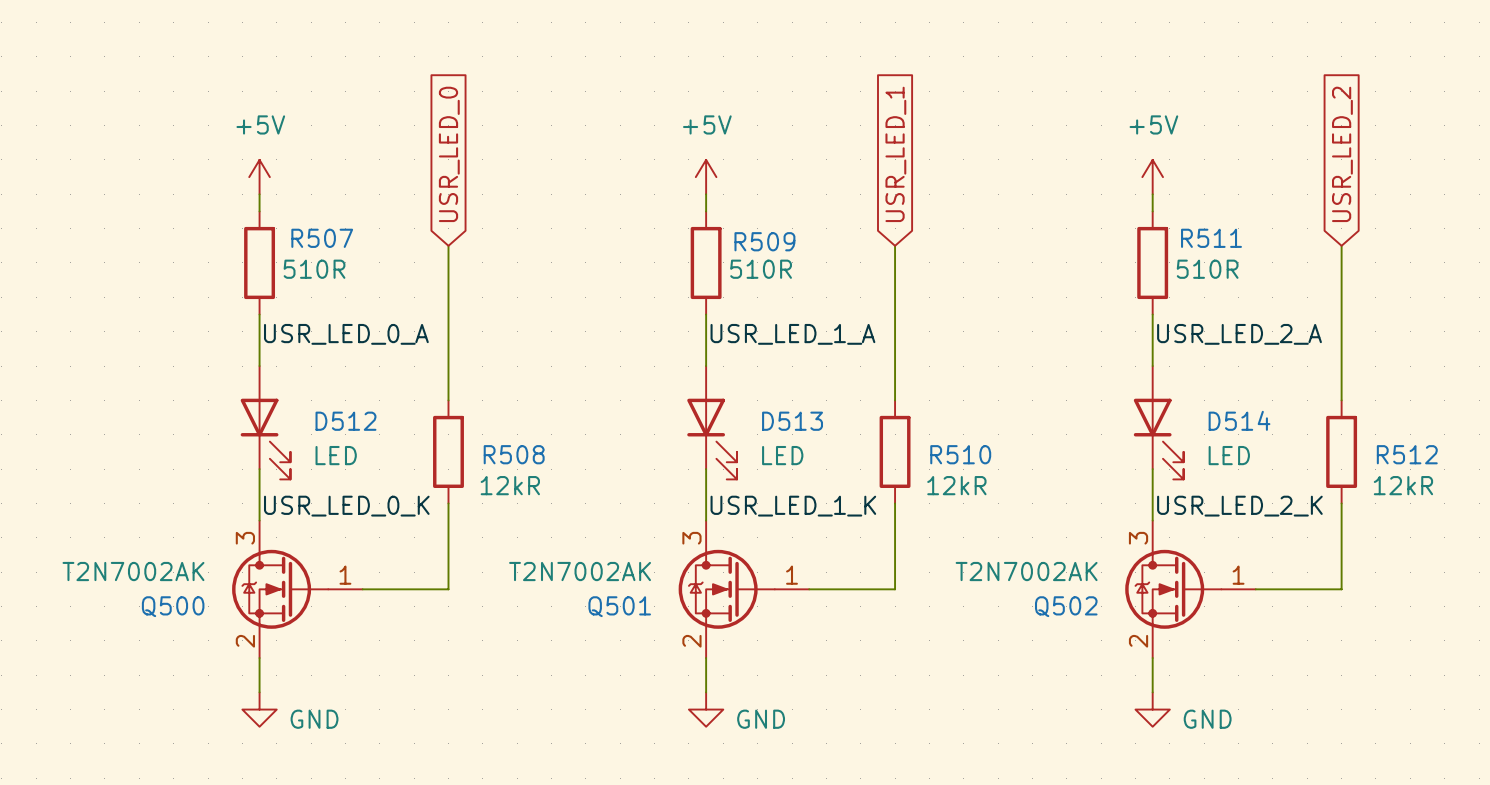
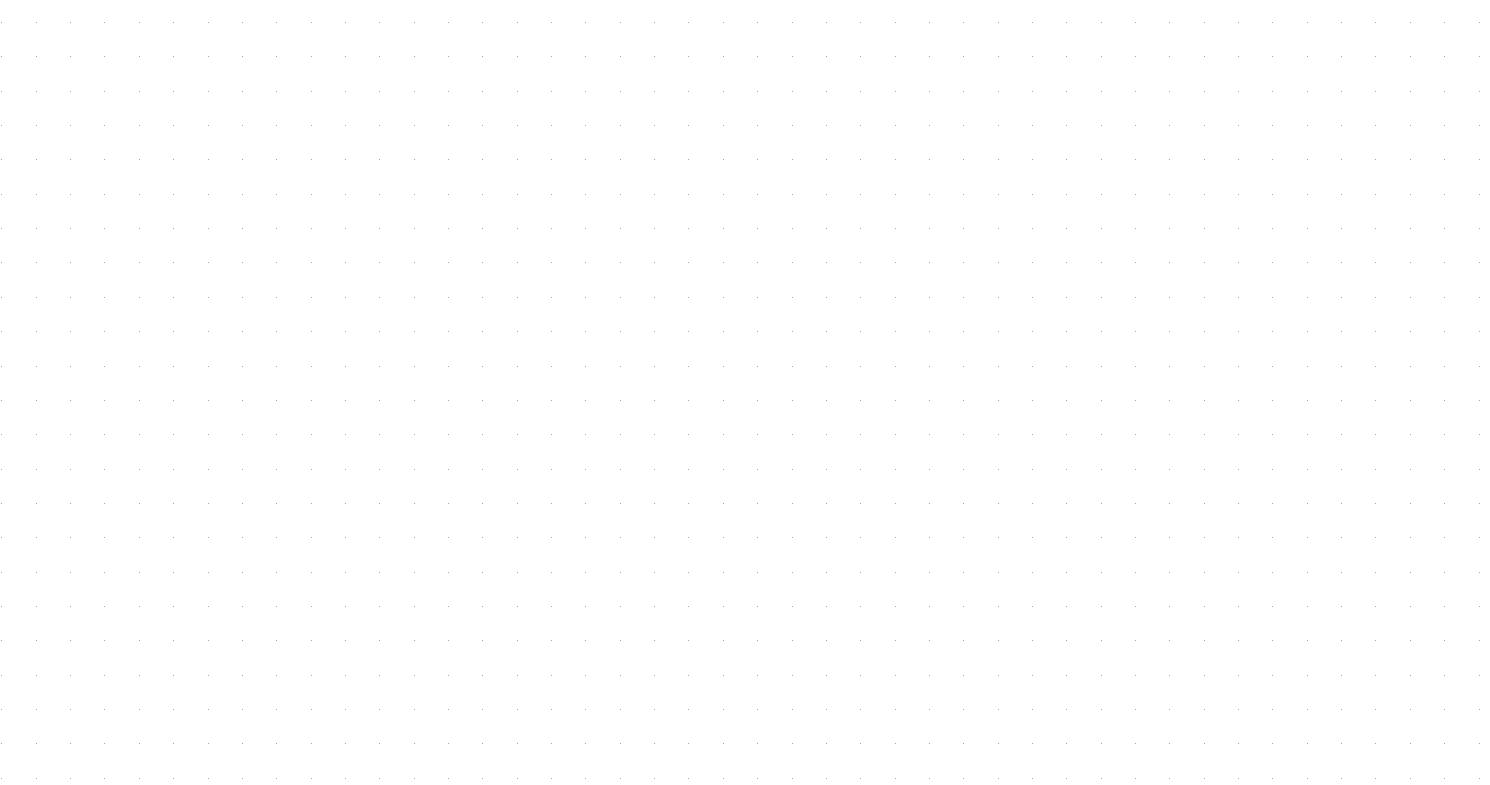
global label: USR_LED_0 (449, 154) -> none
global label: USR_LED_1 (895, 154) -> none
global label: USR_LED_2 (1342, 154) -> none
power symbol: +5V (259, 177) -> none
power symbol: +5V (706, 177) -> none
power symbol: +5V (1152, 177) -> none
wire: (259, 194) (259, 211) -> none
wire: (706, 194) (706, 211) -> none
wire: (1152, 194) (1152, 211) -> none
wire: (448, 245) (448, 400) -> none
wire: (895, 245) (895, 400) -> none
wire: (1341, 245) (1341, 400) -> none
R507: 510R (259, 262) -> none
R509: 510R (706, 262) -> none
R511: 510R (1152, 262) -> none
wire: (259, 314) (259, 366) -> none
wire: (706, 314) (706, 366) -> none
wire: (1152, 314) (1152, 366) -> none
label: USR_LED_0_A (346, 334) -> none
label: USR_LED_1_A (792, 334) -> none
label: USR_LED_2_A (1239, 334) -> none
D512: LED (265, 422) -> none
D513: LED (712, 422) -> none
D514: LED (1158, 422) -> none
R508: 12kR (448, 451) -> none
R510: 12kR (895, 451) -> none
R512: 12kR (1341, 451) -> none
wire: (259, 469) (259, 520) -> none
wire: (706, 469) (706, 520) -> none
wire: (1152, 469) (1152, 520) -> none
wire: (448, 503) (448, 589) (362, 589) -> none
wire: (895, 503) (895, 589) (809, 589) -> none
wire: (1341, 503) (1341, 589) (1255, 589) -> none
label: USR_LED_0_K (346, 506) -> none
label: USR_LED_1_K (793, 506) -> none
label: USR_LED_2_K (1239, 506) -> none
Q500: T2N7002AK (297, 589) -> none
Q501: T2N7002AK (743, 589) -> none
Q502: T2N7002AK (1190, 589) -> none
wire: (259, 658) (259, 692) -> none
wire: (706, 658) (706, 692) -> none
wire: (1152, 658) (1152, 692) -> none
power symbol: GND (259, 709) -> none
power symbol: GND (706, 709) -> none
power symbol: GND (1152, 709) -> none

